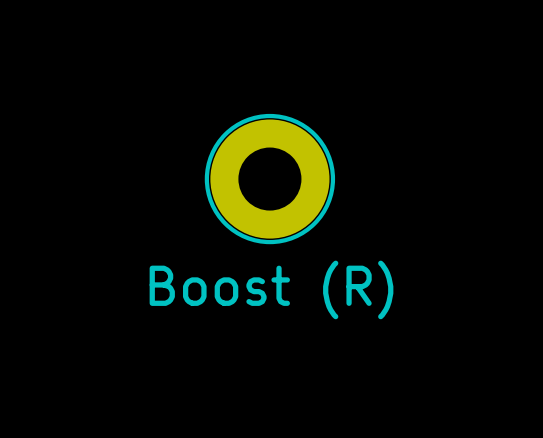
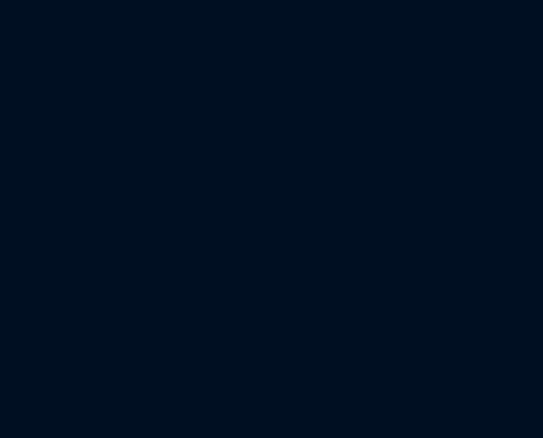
part: Boost (R) (269, 179) -> none

